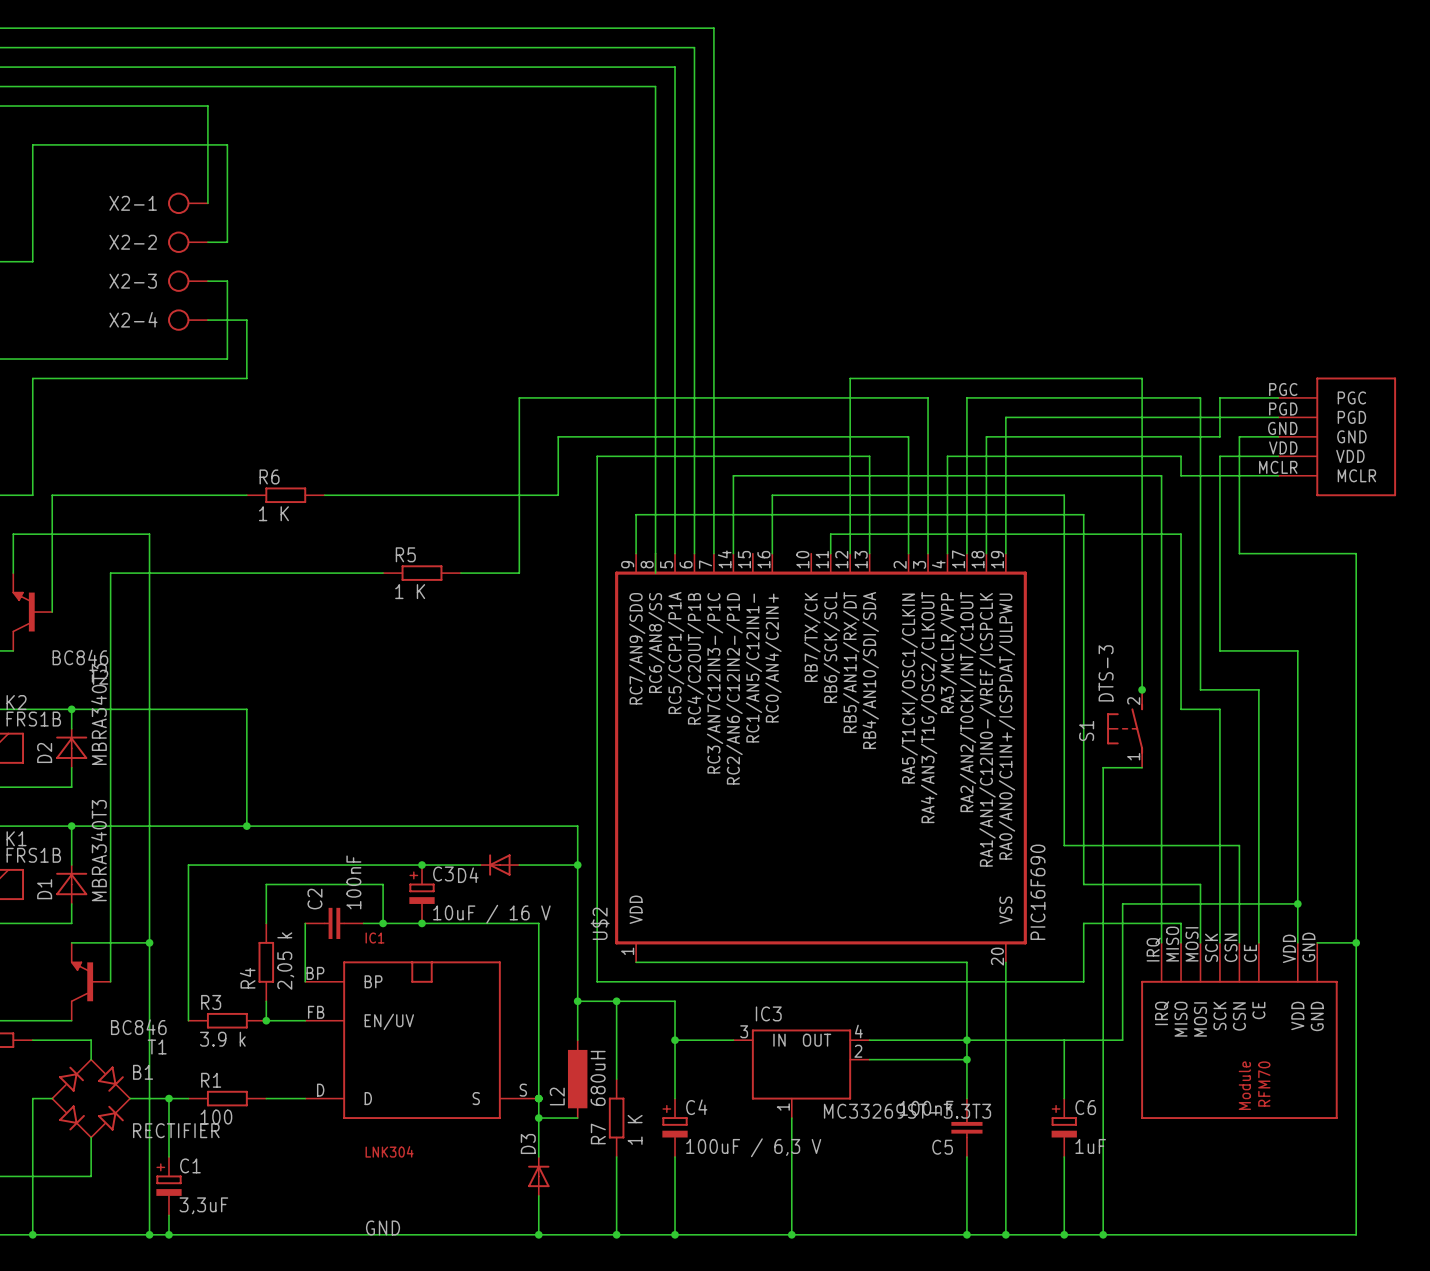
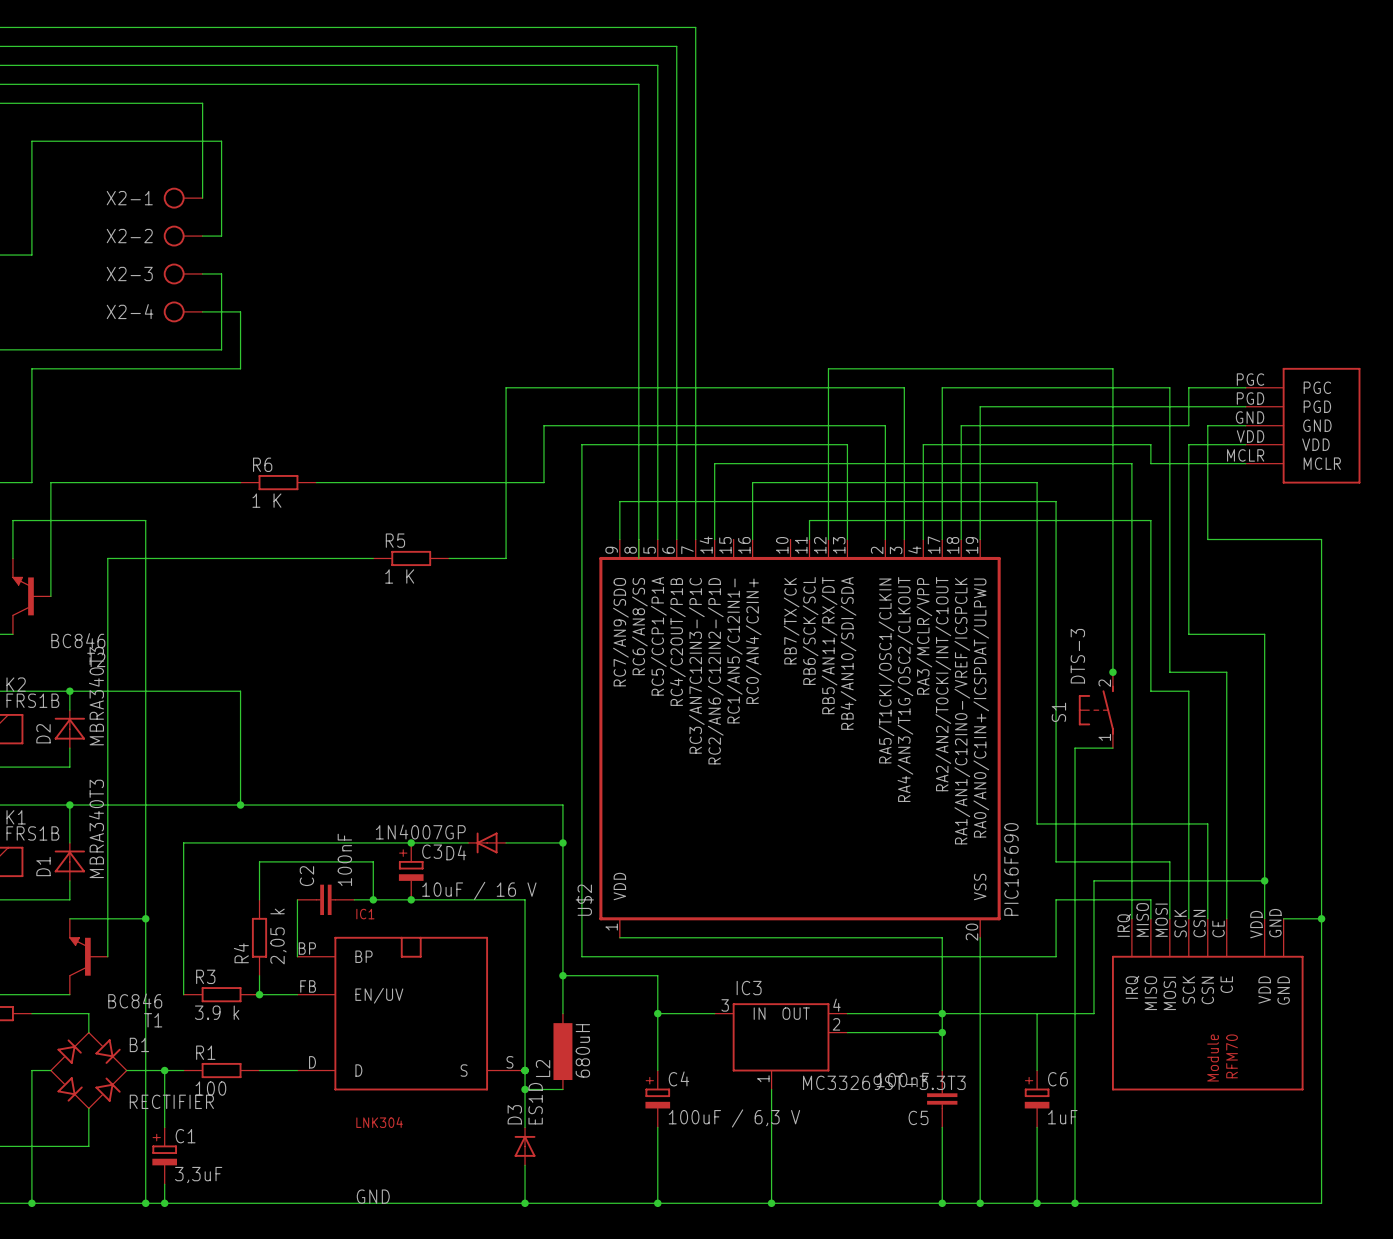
D4 value: none -> 1N4007GP (420, 832)
wire: (616, 1001) (616, 1079) -> none
junction: (616, 1001) -> none
R7: 1 K (616, 1118) -> none
D3 value: none -> ES1D (535, 1103)
wire: (616, 1156) (616, 1234) -> none
junction: (616, 1234) -> none

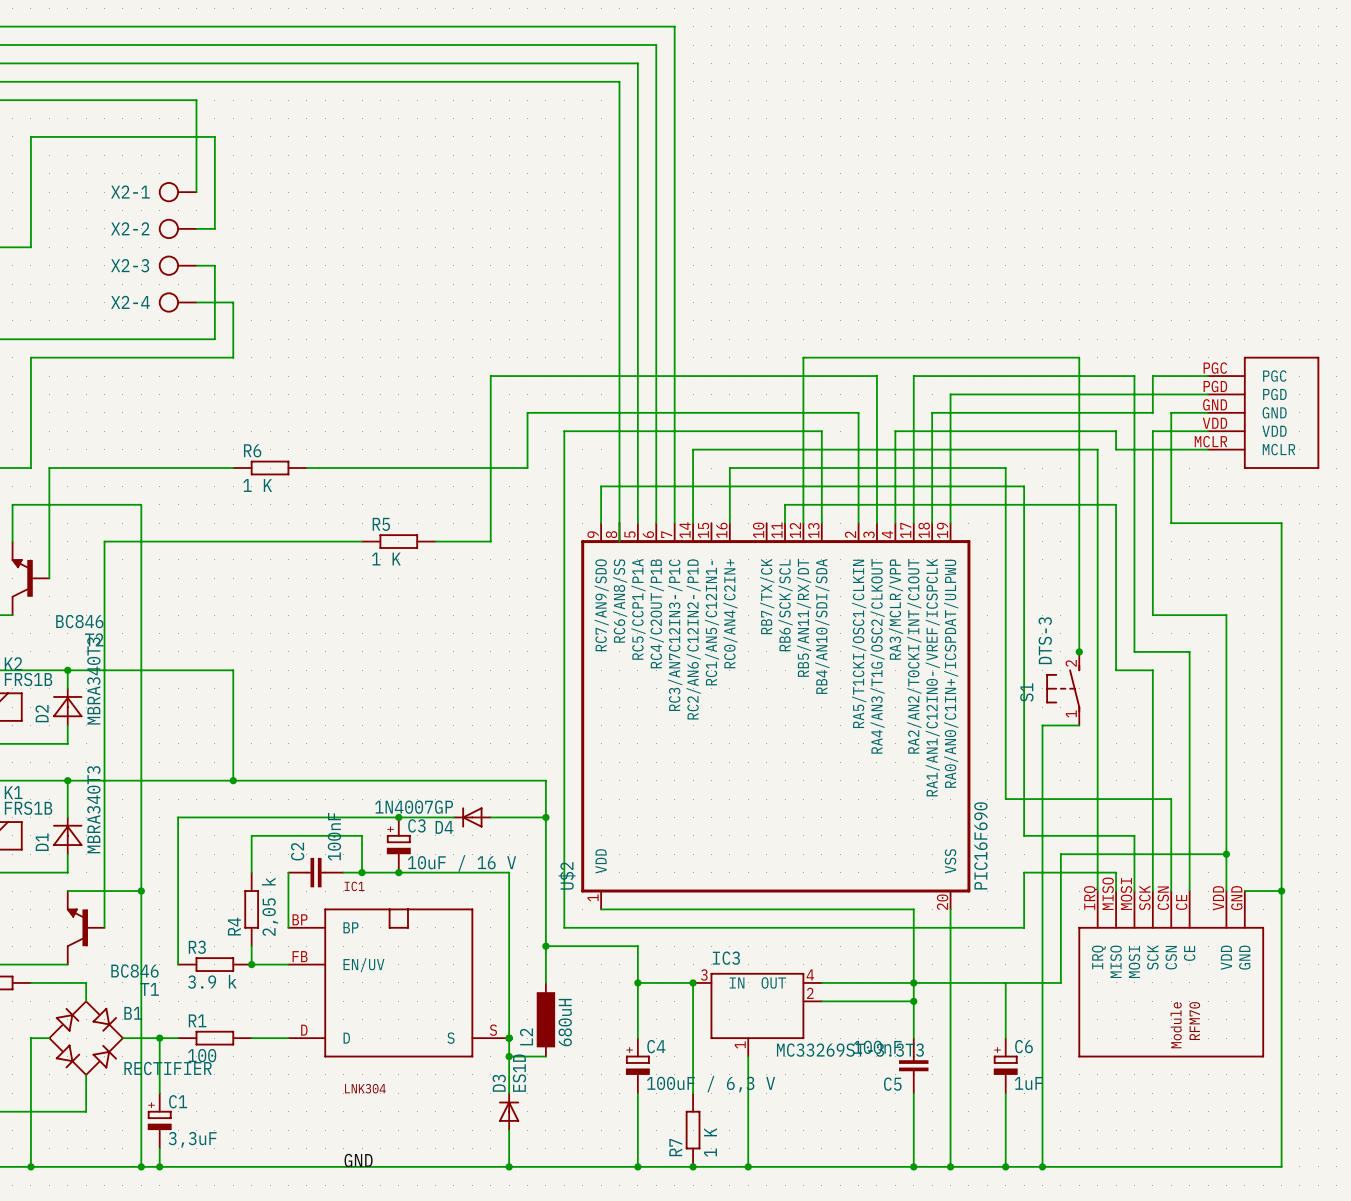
wire: none -> (693, 982) (693, 1093)
junction: none -> (693, 982)
R7: none -> 1 K (693, 1130)
junction: none -> (693, 1166)

